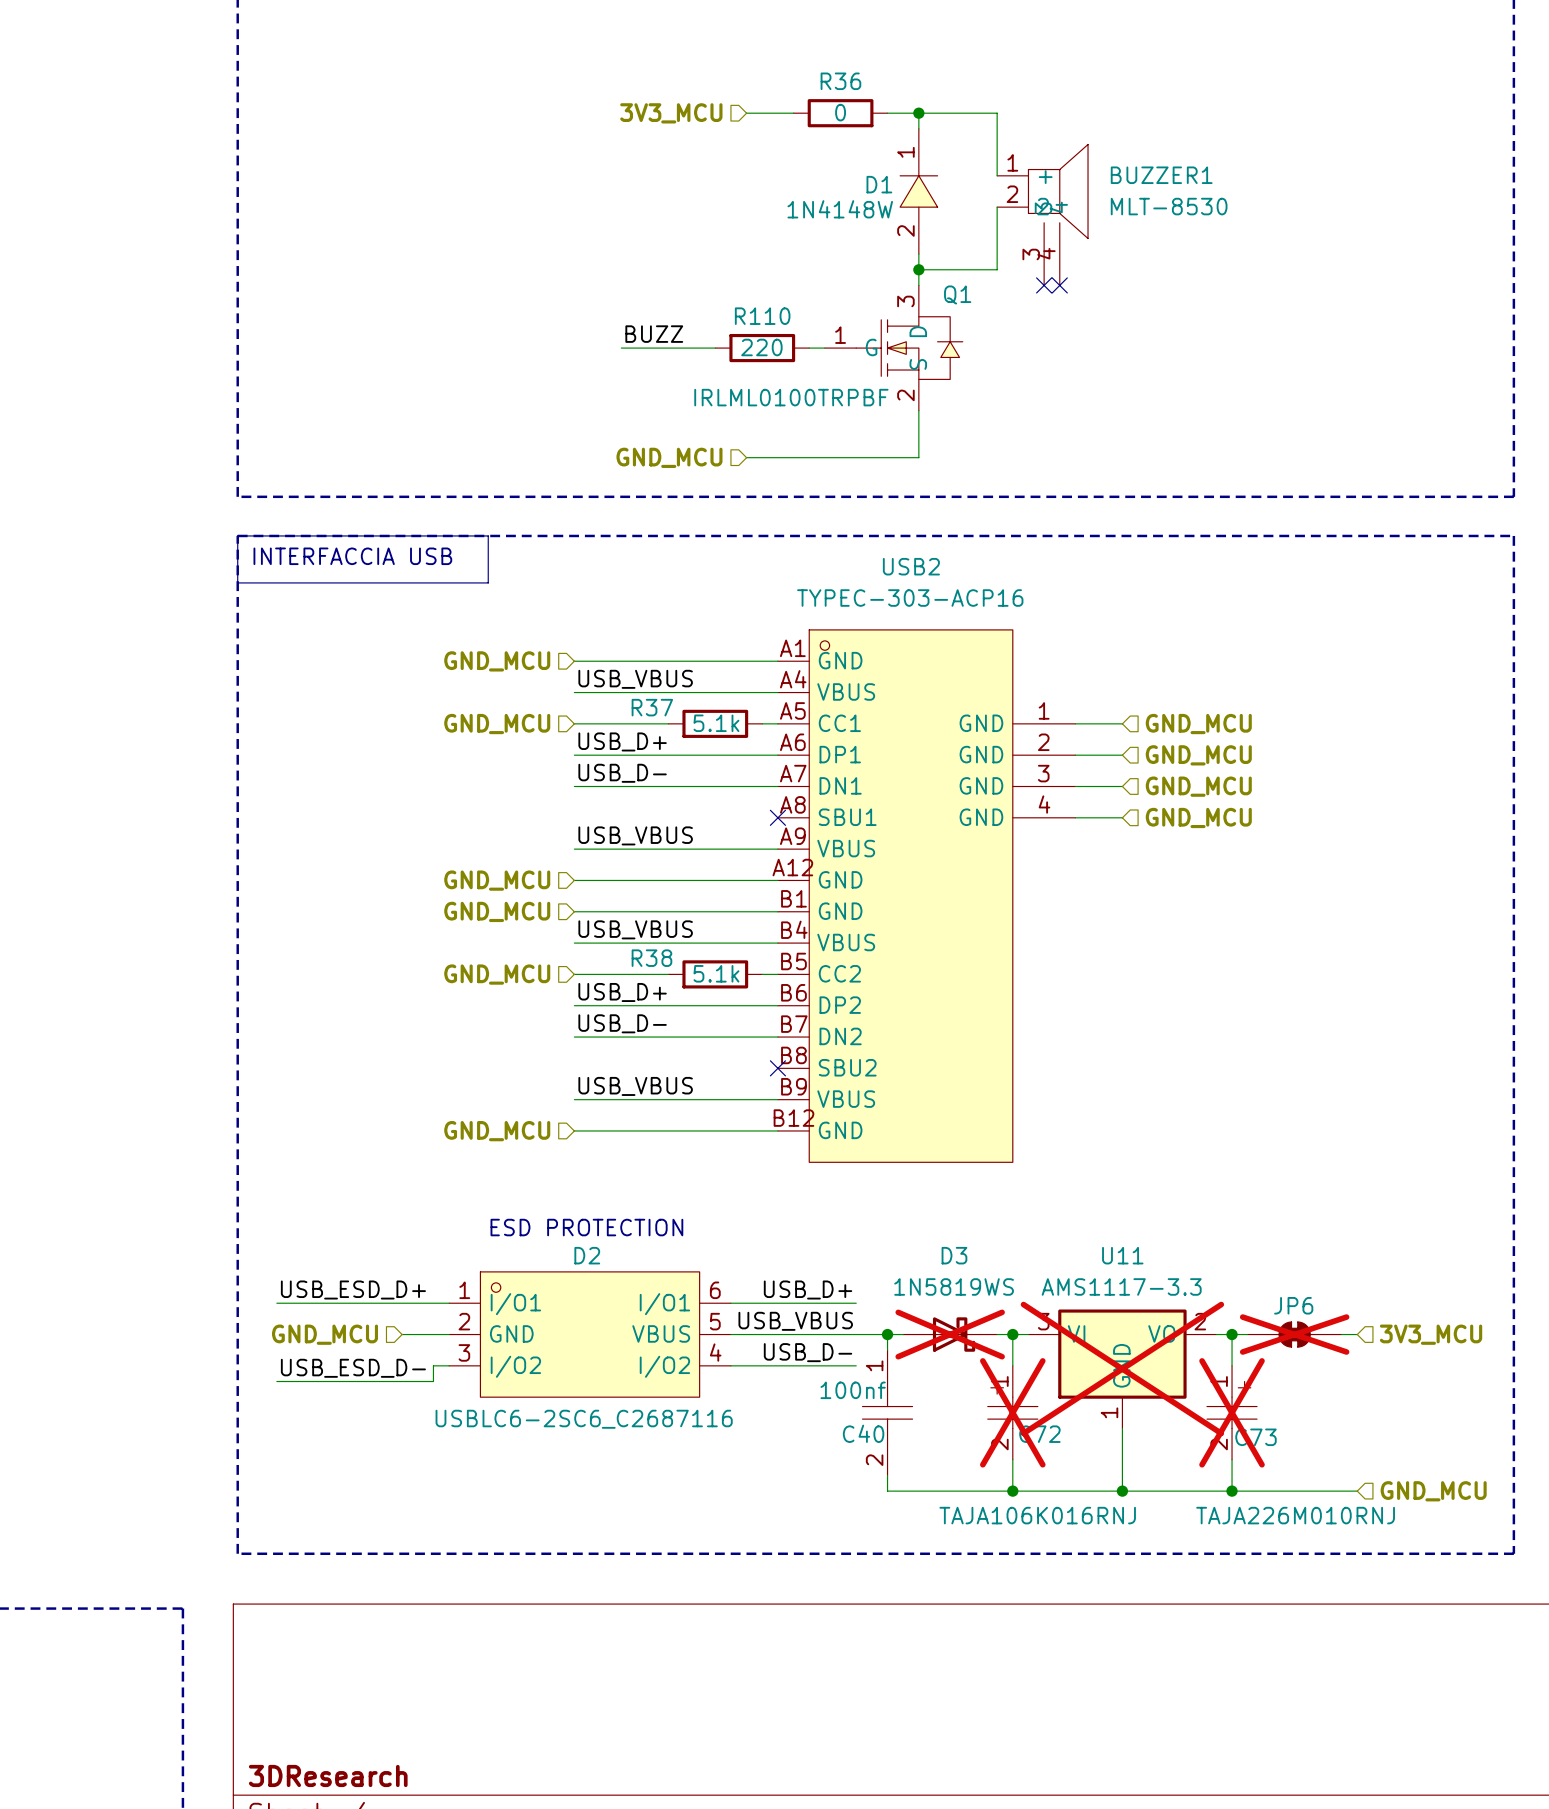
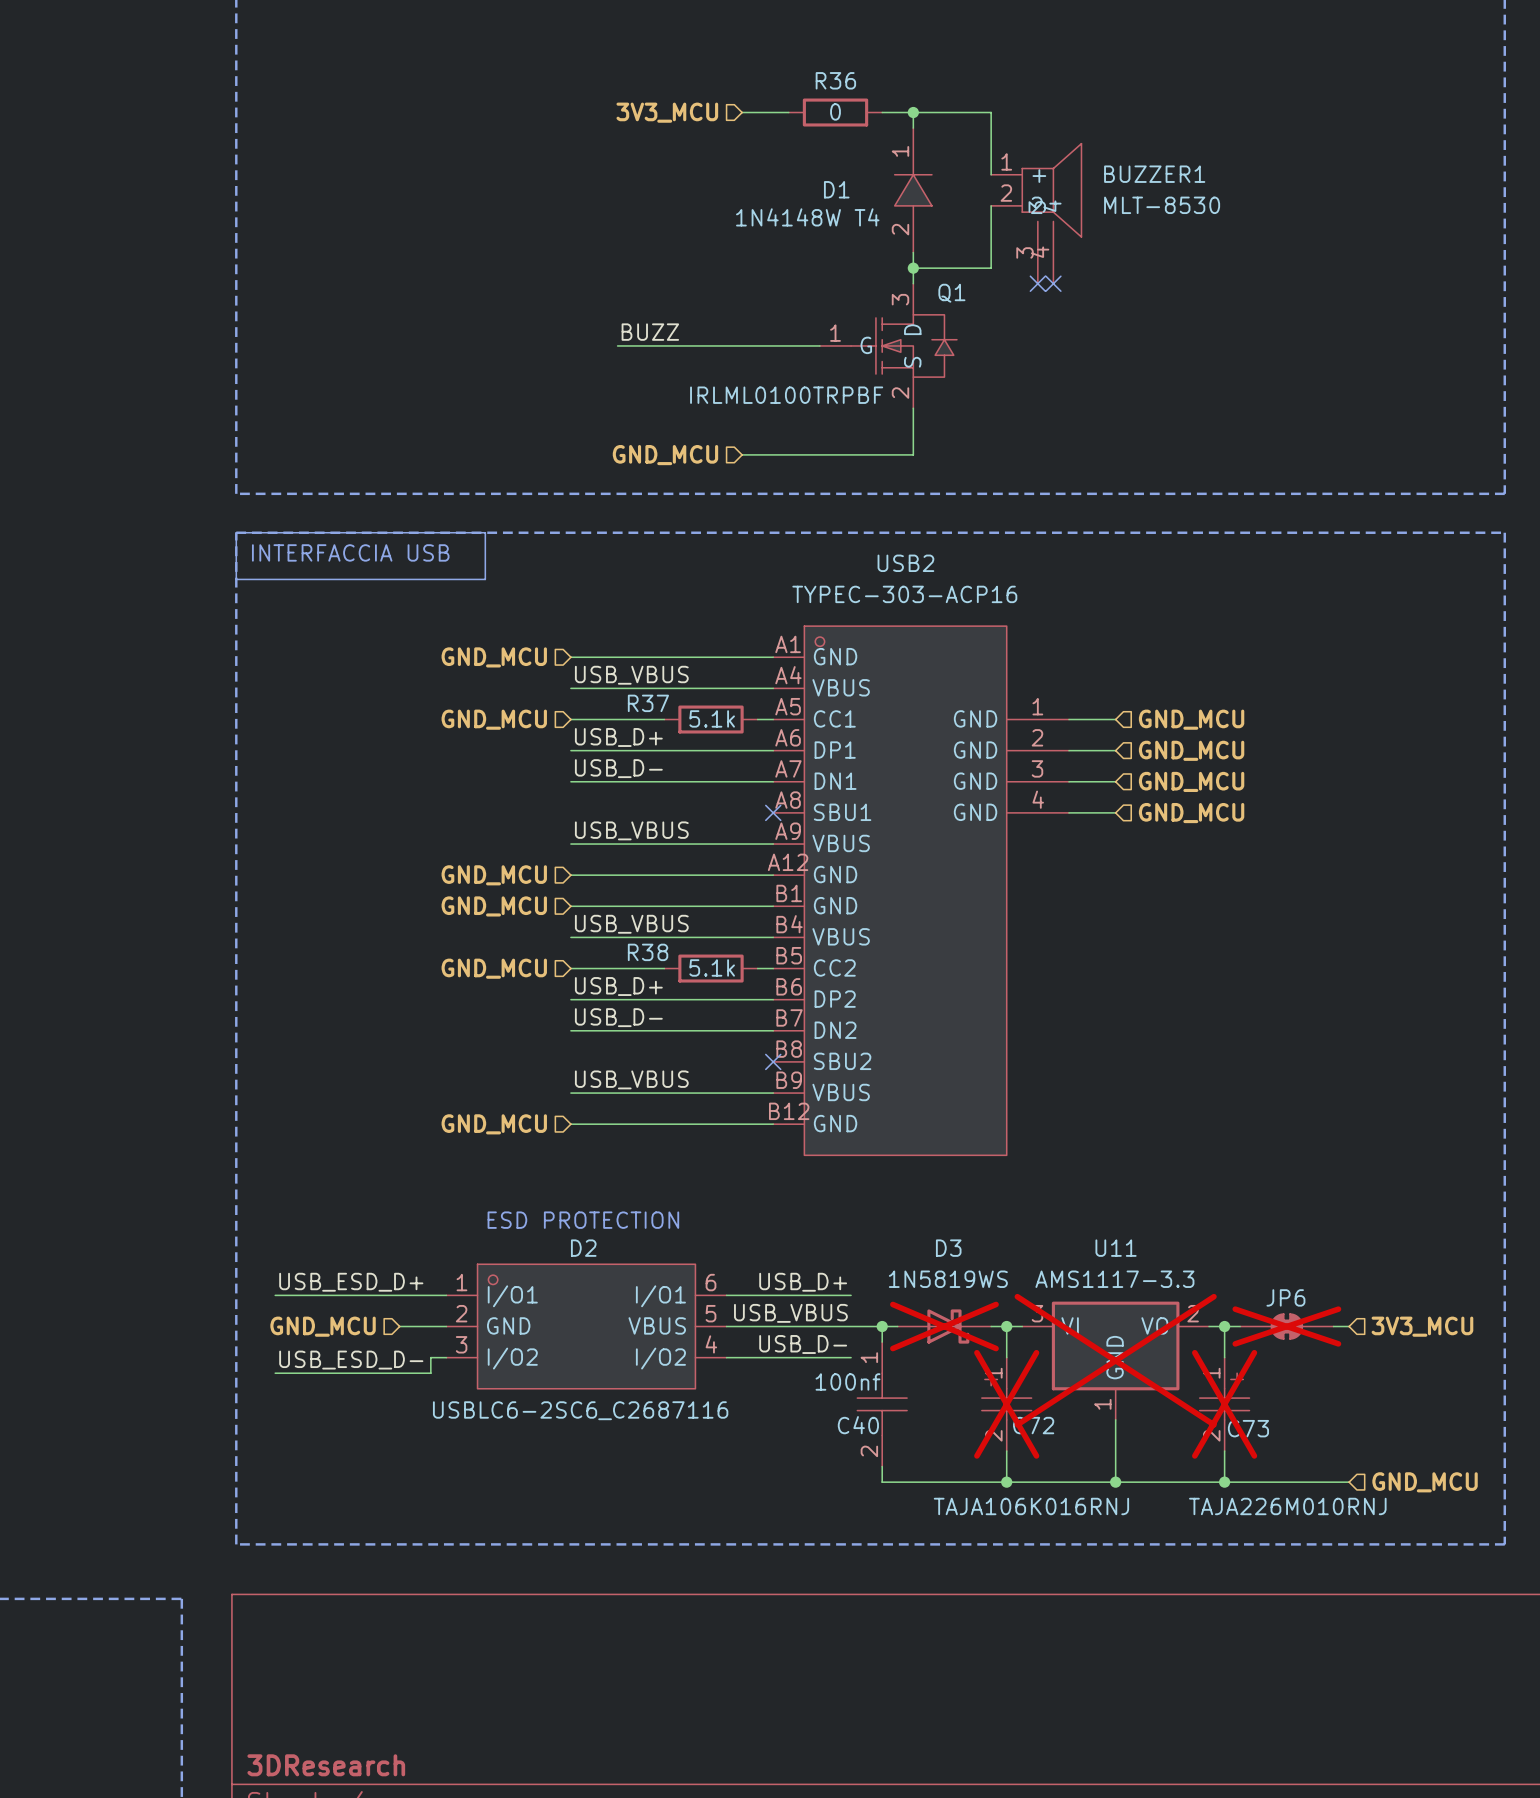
D1 name position: D1 (879, 184) -> D1 (836, 189)
D1 value: 1N4148W (840, 209) -> 1N4148W T4 (807, 217)
wire: none -> (710, 345) (804, 345)
R110: 220 (762, 348) -> none

